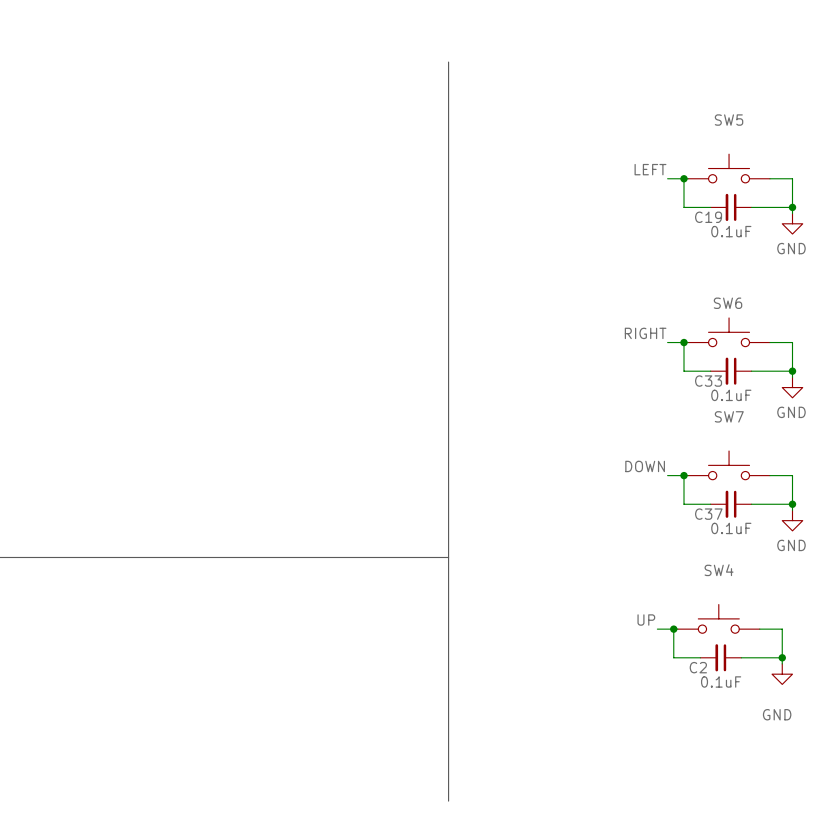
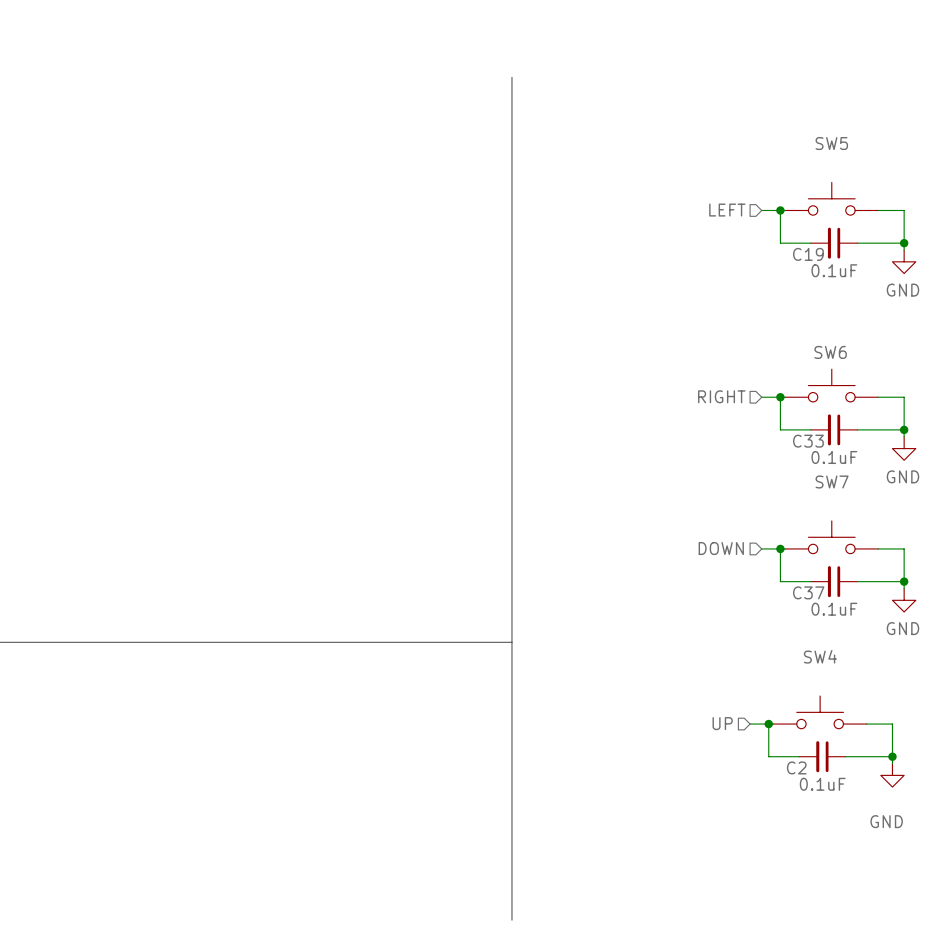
label: LEFT (650, 169) -> none
hierarchical label: none -> LEFT (727, 210)
label: RIGHT (645, 333) -> none
hierarchical label: none -> RIGHT (721, 396)
label: DOWN (645, 466) -> none
hierarchical label: none -> DOWN (721, 548)
label: UP (646, 620) -> none
hierarchical label: none -> UP (722, 723)

